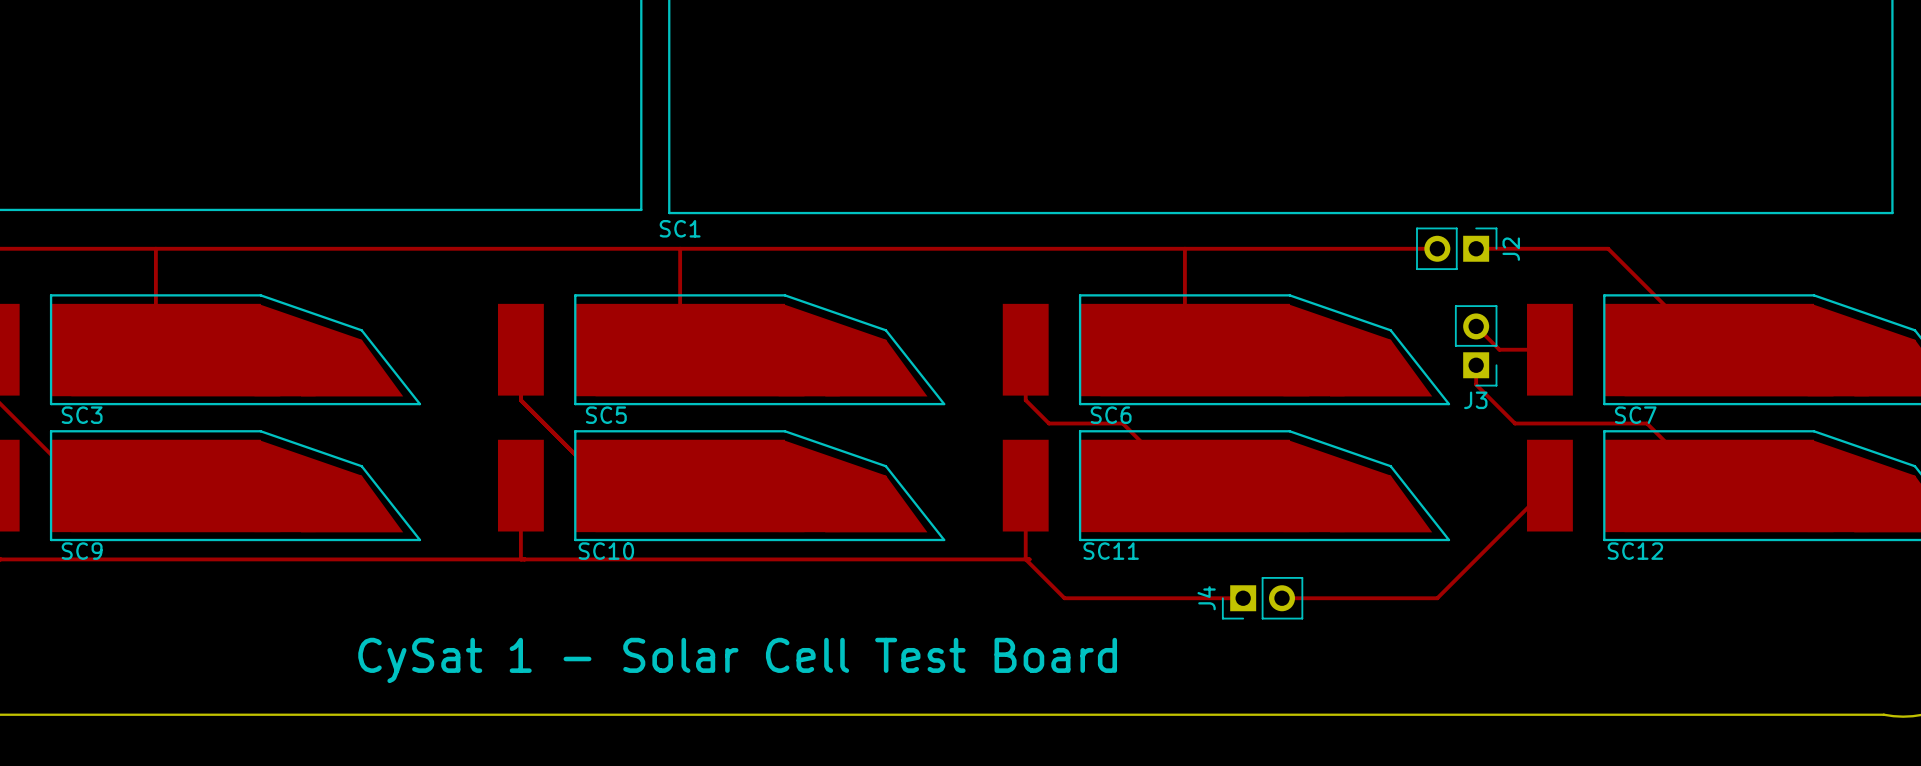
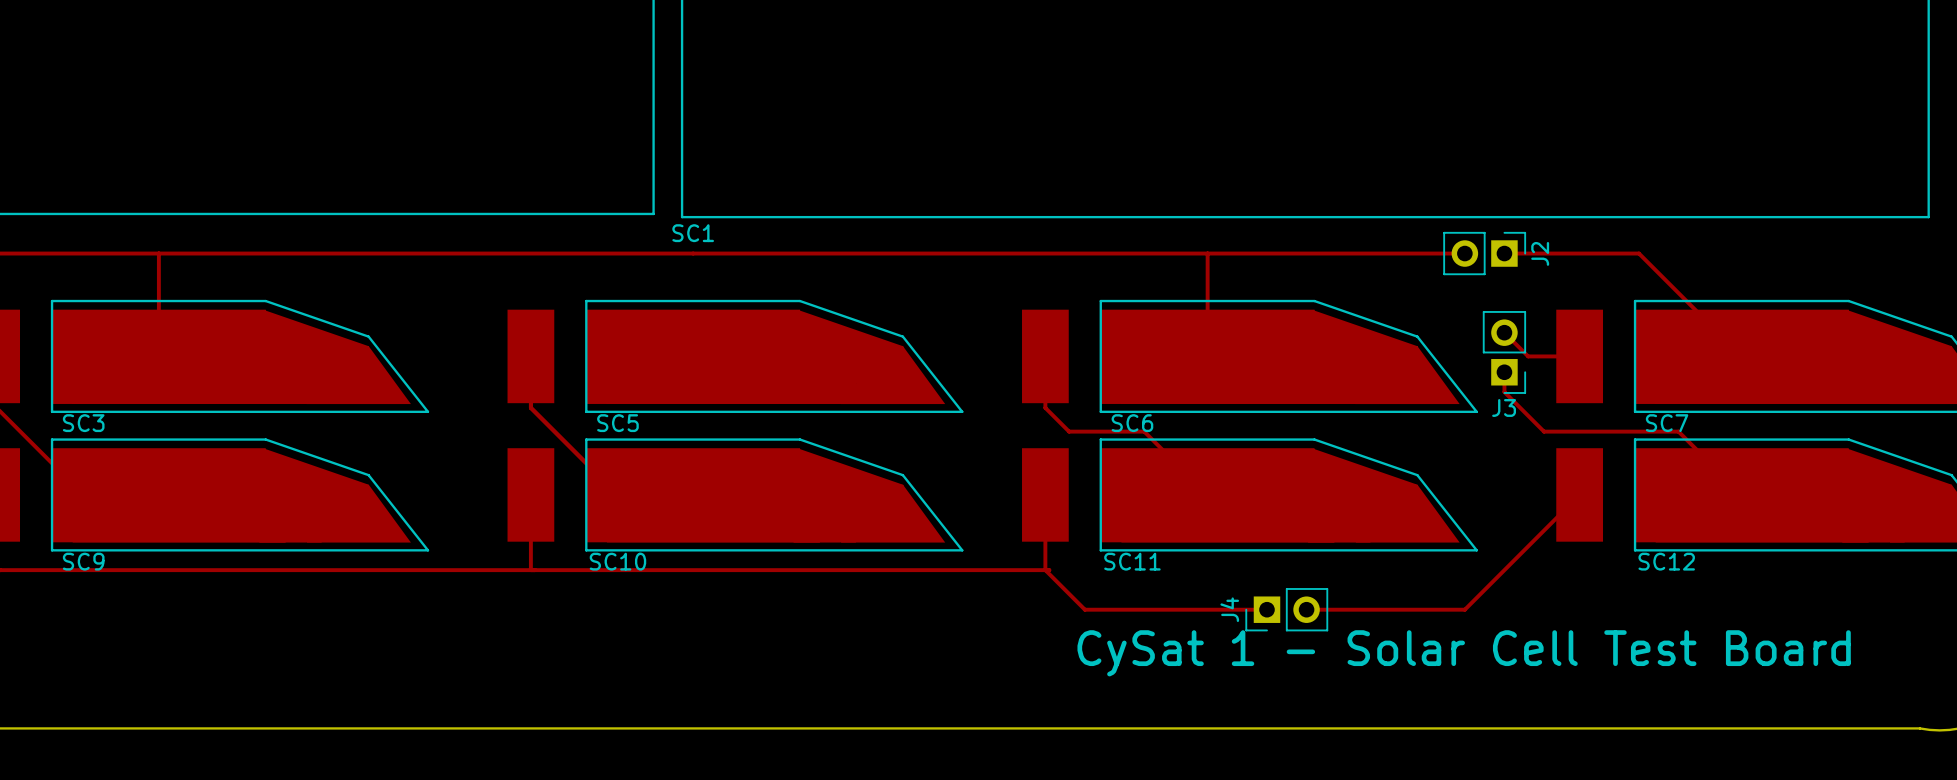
top track: (680, 248) (680, 349) -> none
text: none -> CySat 1 - Solar Cell Test Board (1464, 653)
text: CySat 1 - Solar Cell Test Board (737, 660) -> none

